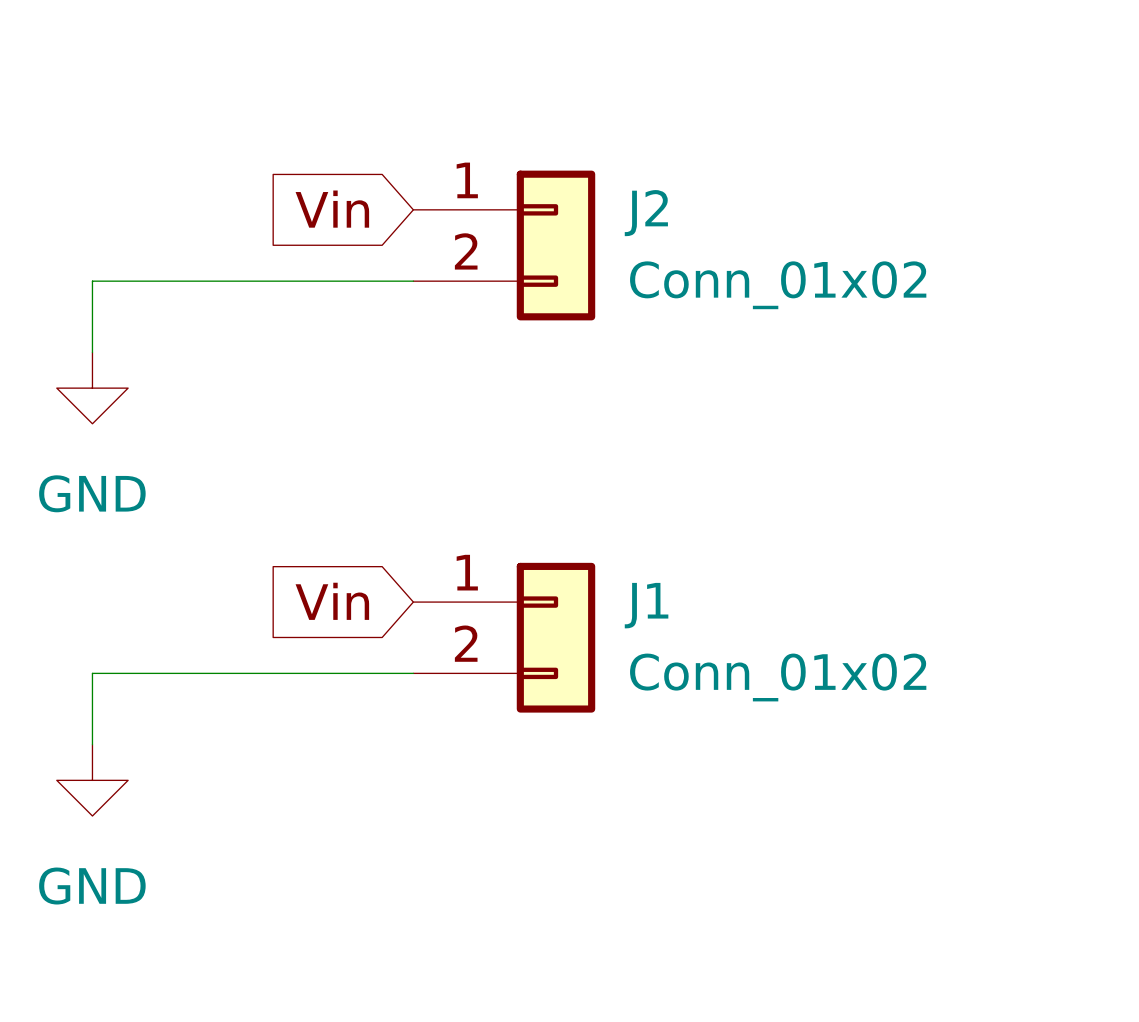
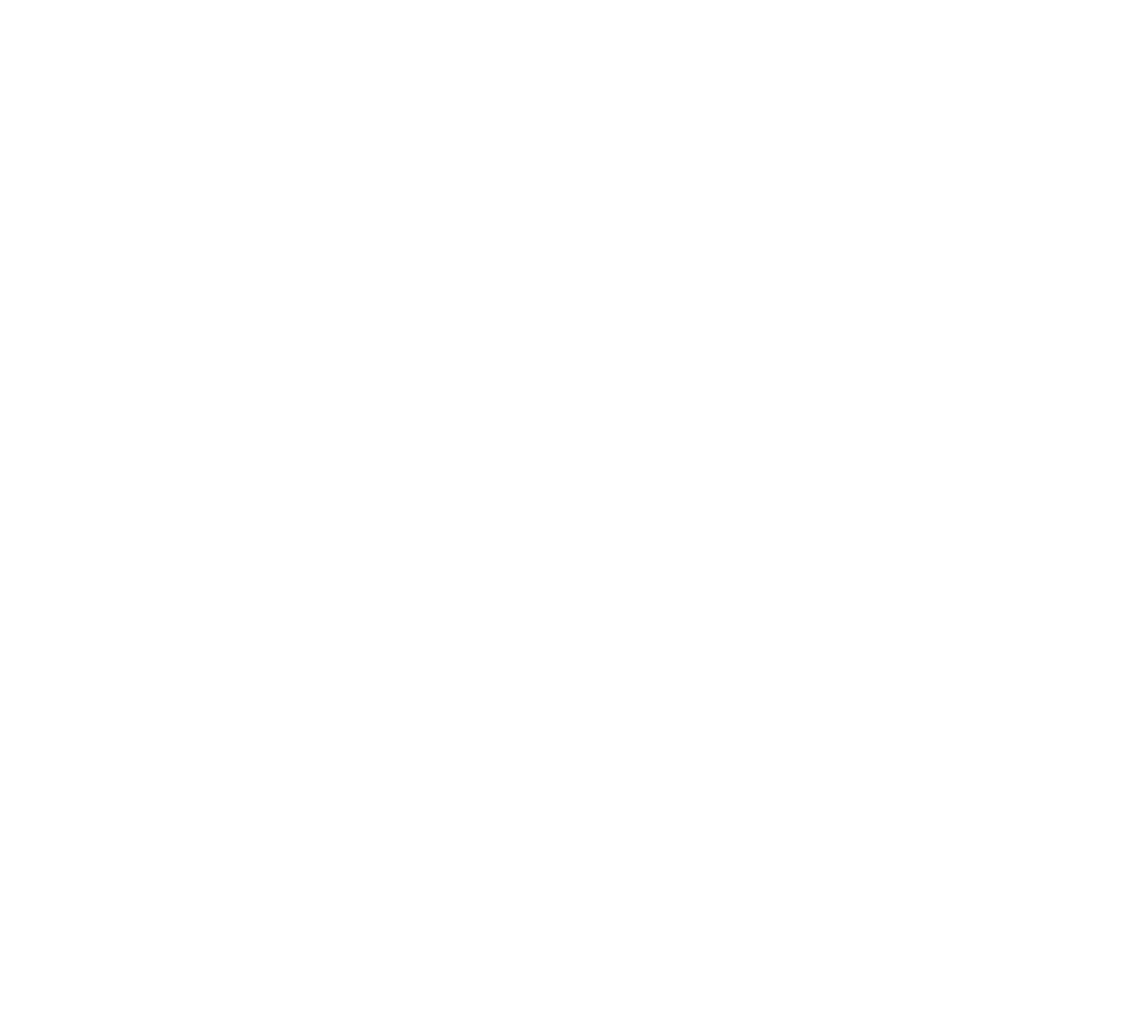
global label: Vin (332, 209) -> none
J2: Conn_01x02 (504, 245) -> none
wire: (413, 281) (92, 281) (92, 352) -> none
power symbol: GND (92, 388) -> none
global label: Vin (332, 601) -> none
J1: Conn_01x02 (504, 637) -> none
wire: (413, 673) (92, 673) (92, 744) -> none
power symbol: GND (92, 780) -> none

